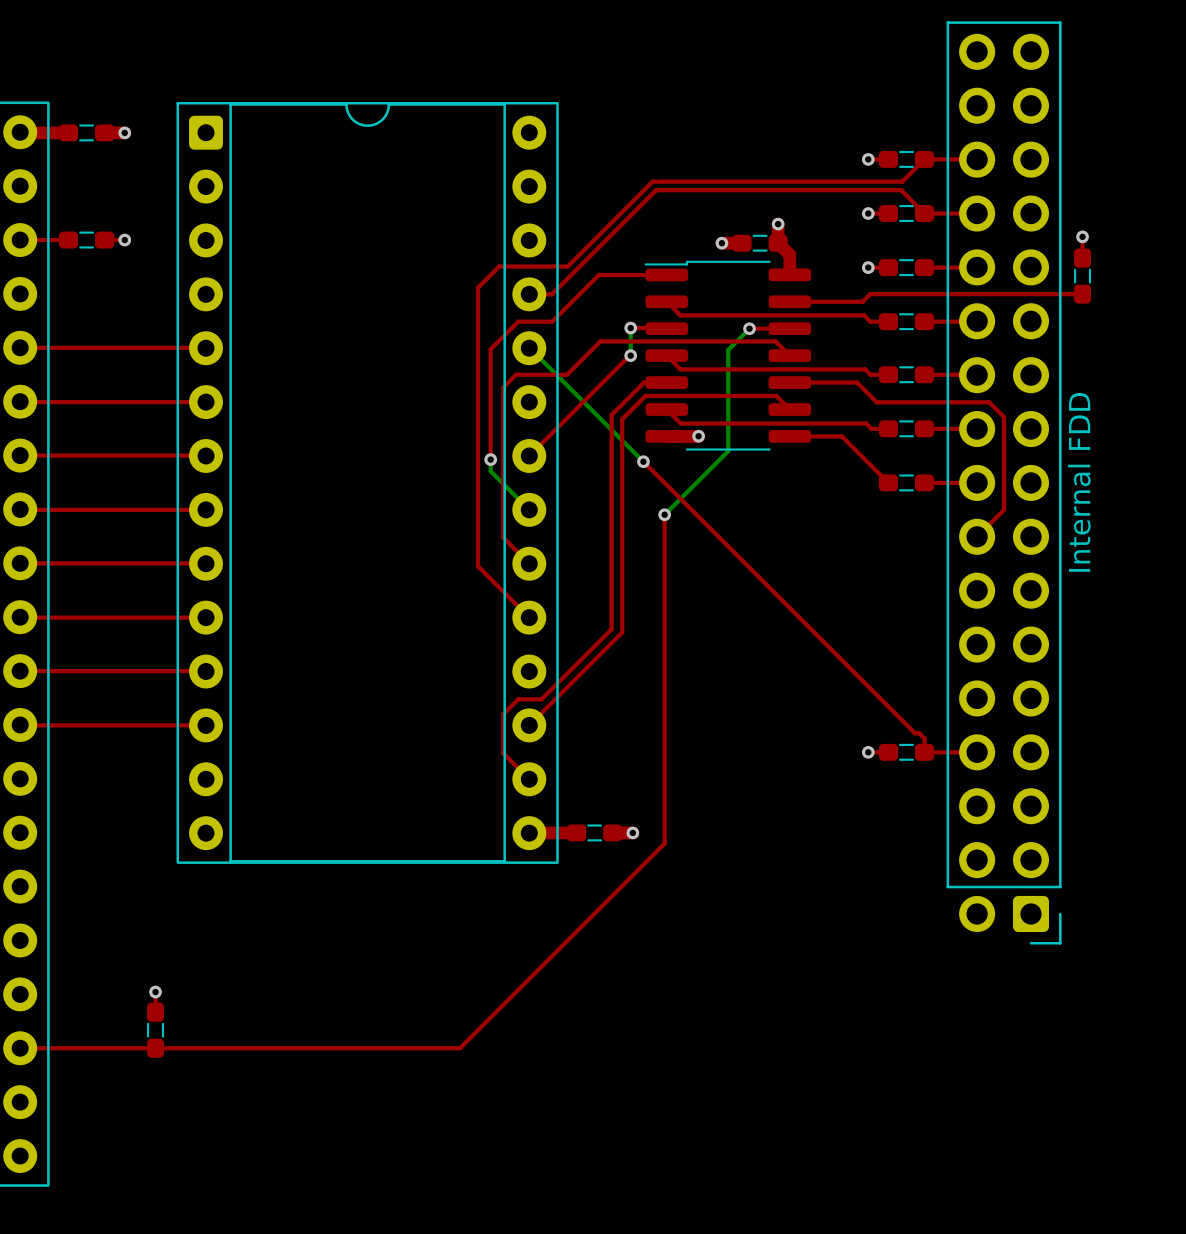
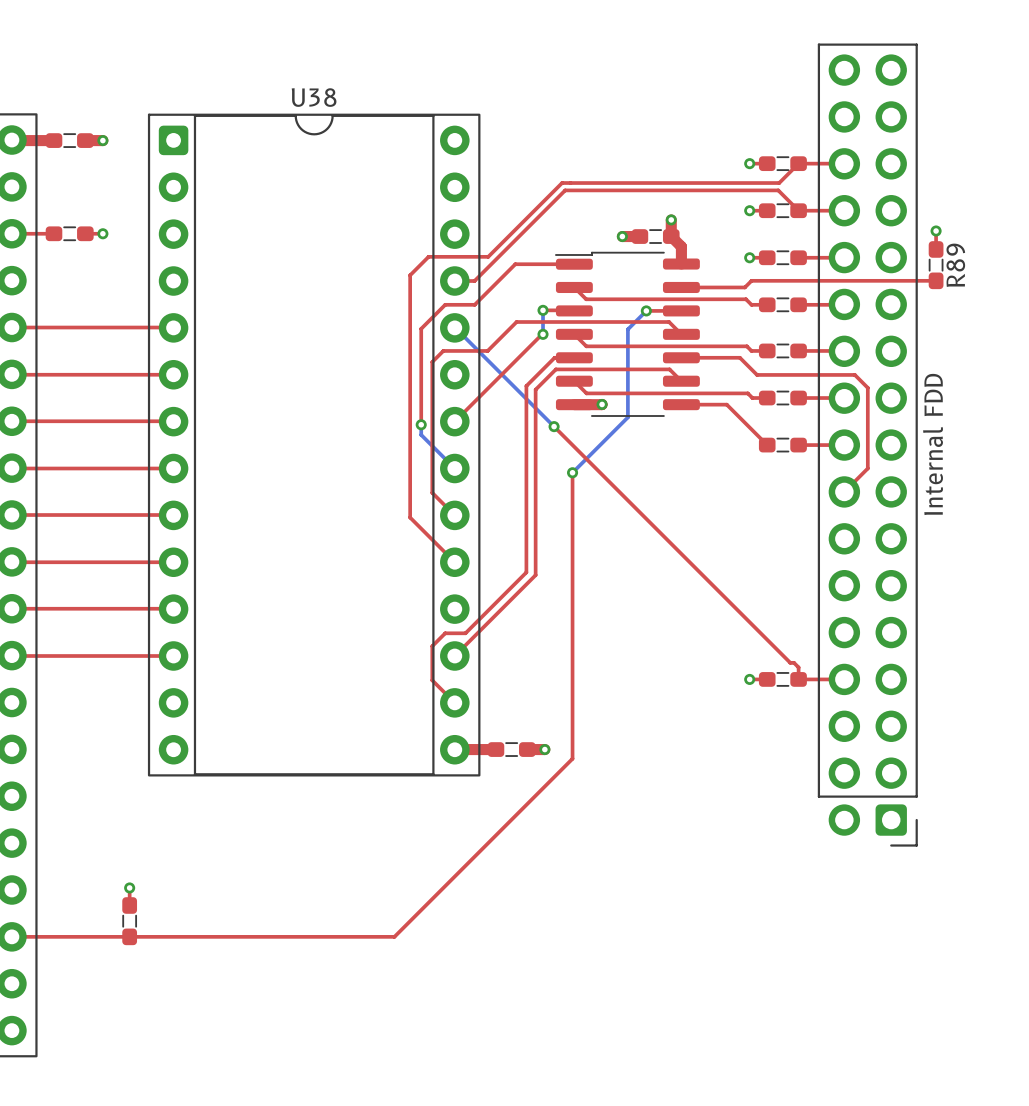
U38 name: none -> U38 (314, 97)
R89 name: none -> R89 (955, 265)

